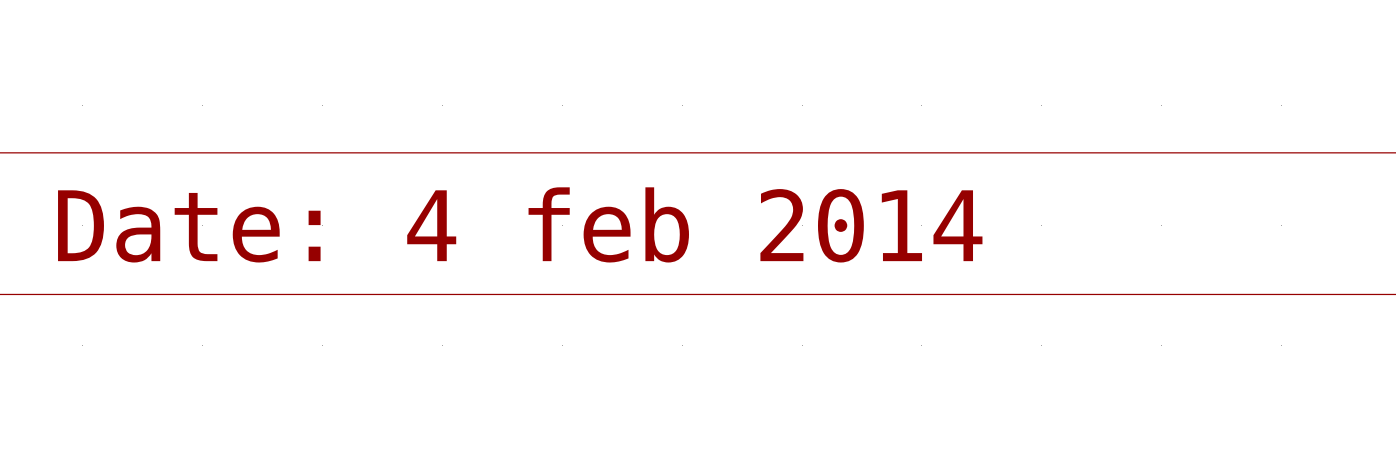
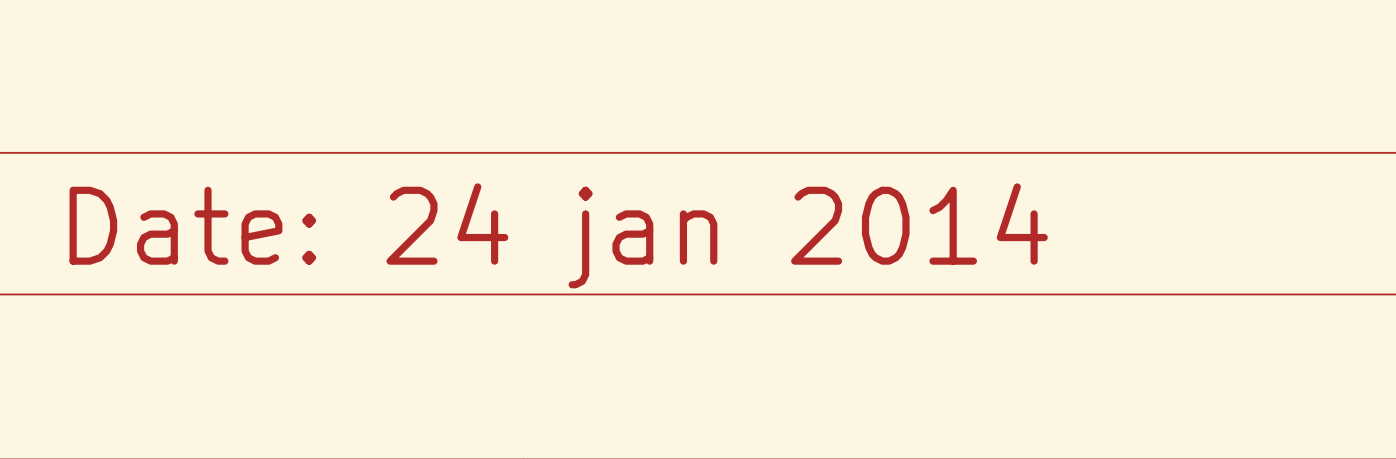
title block: Date: 4 feb 2014 (520, 224) -> Date: 24 jan 2014 (558, 235)

